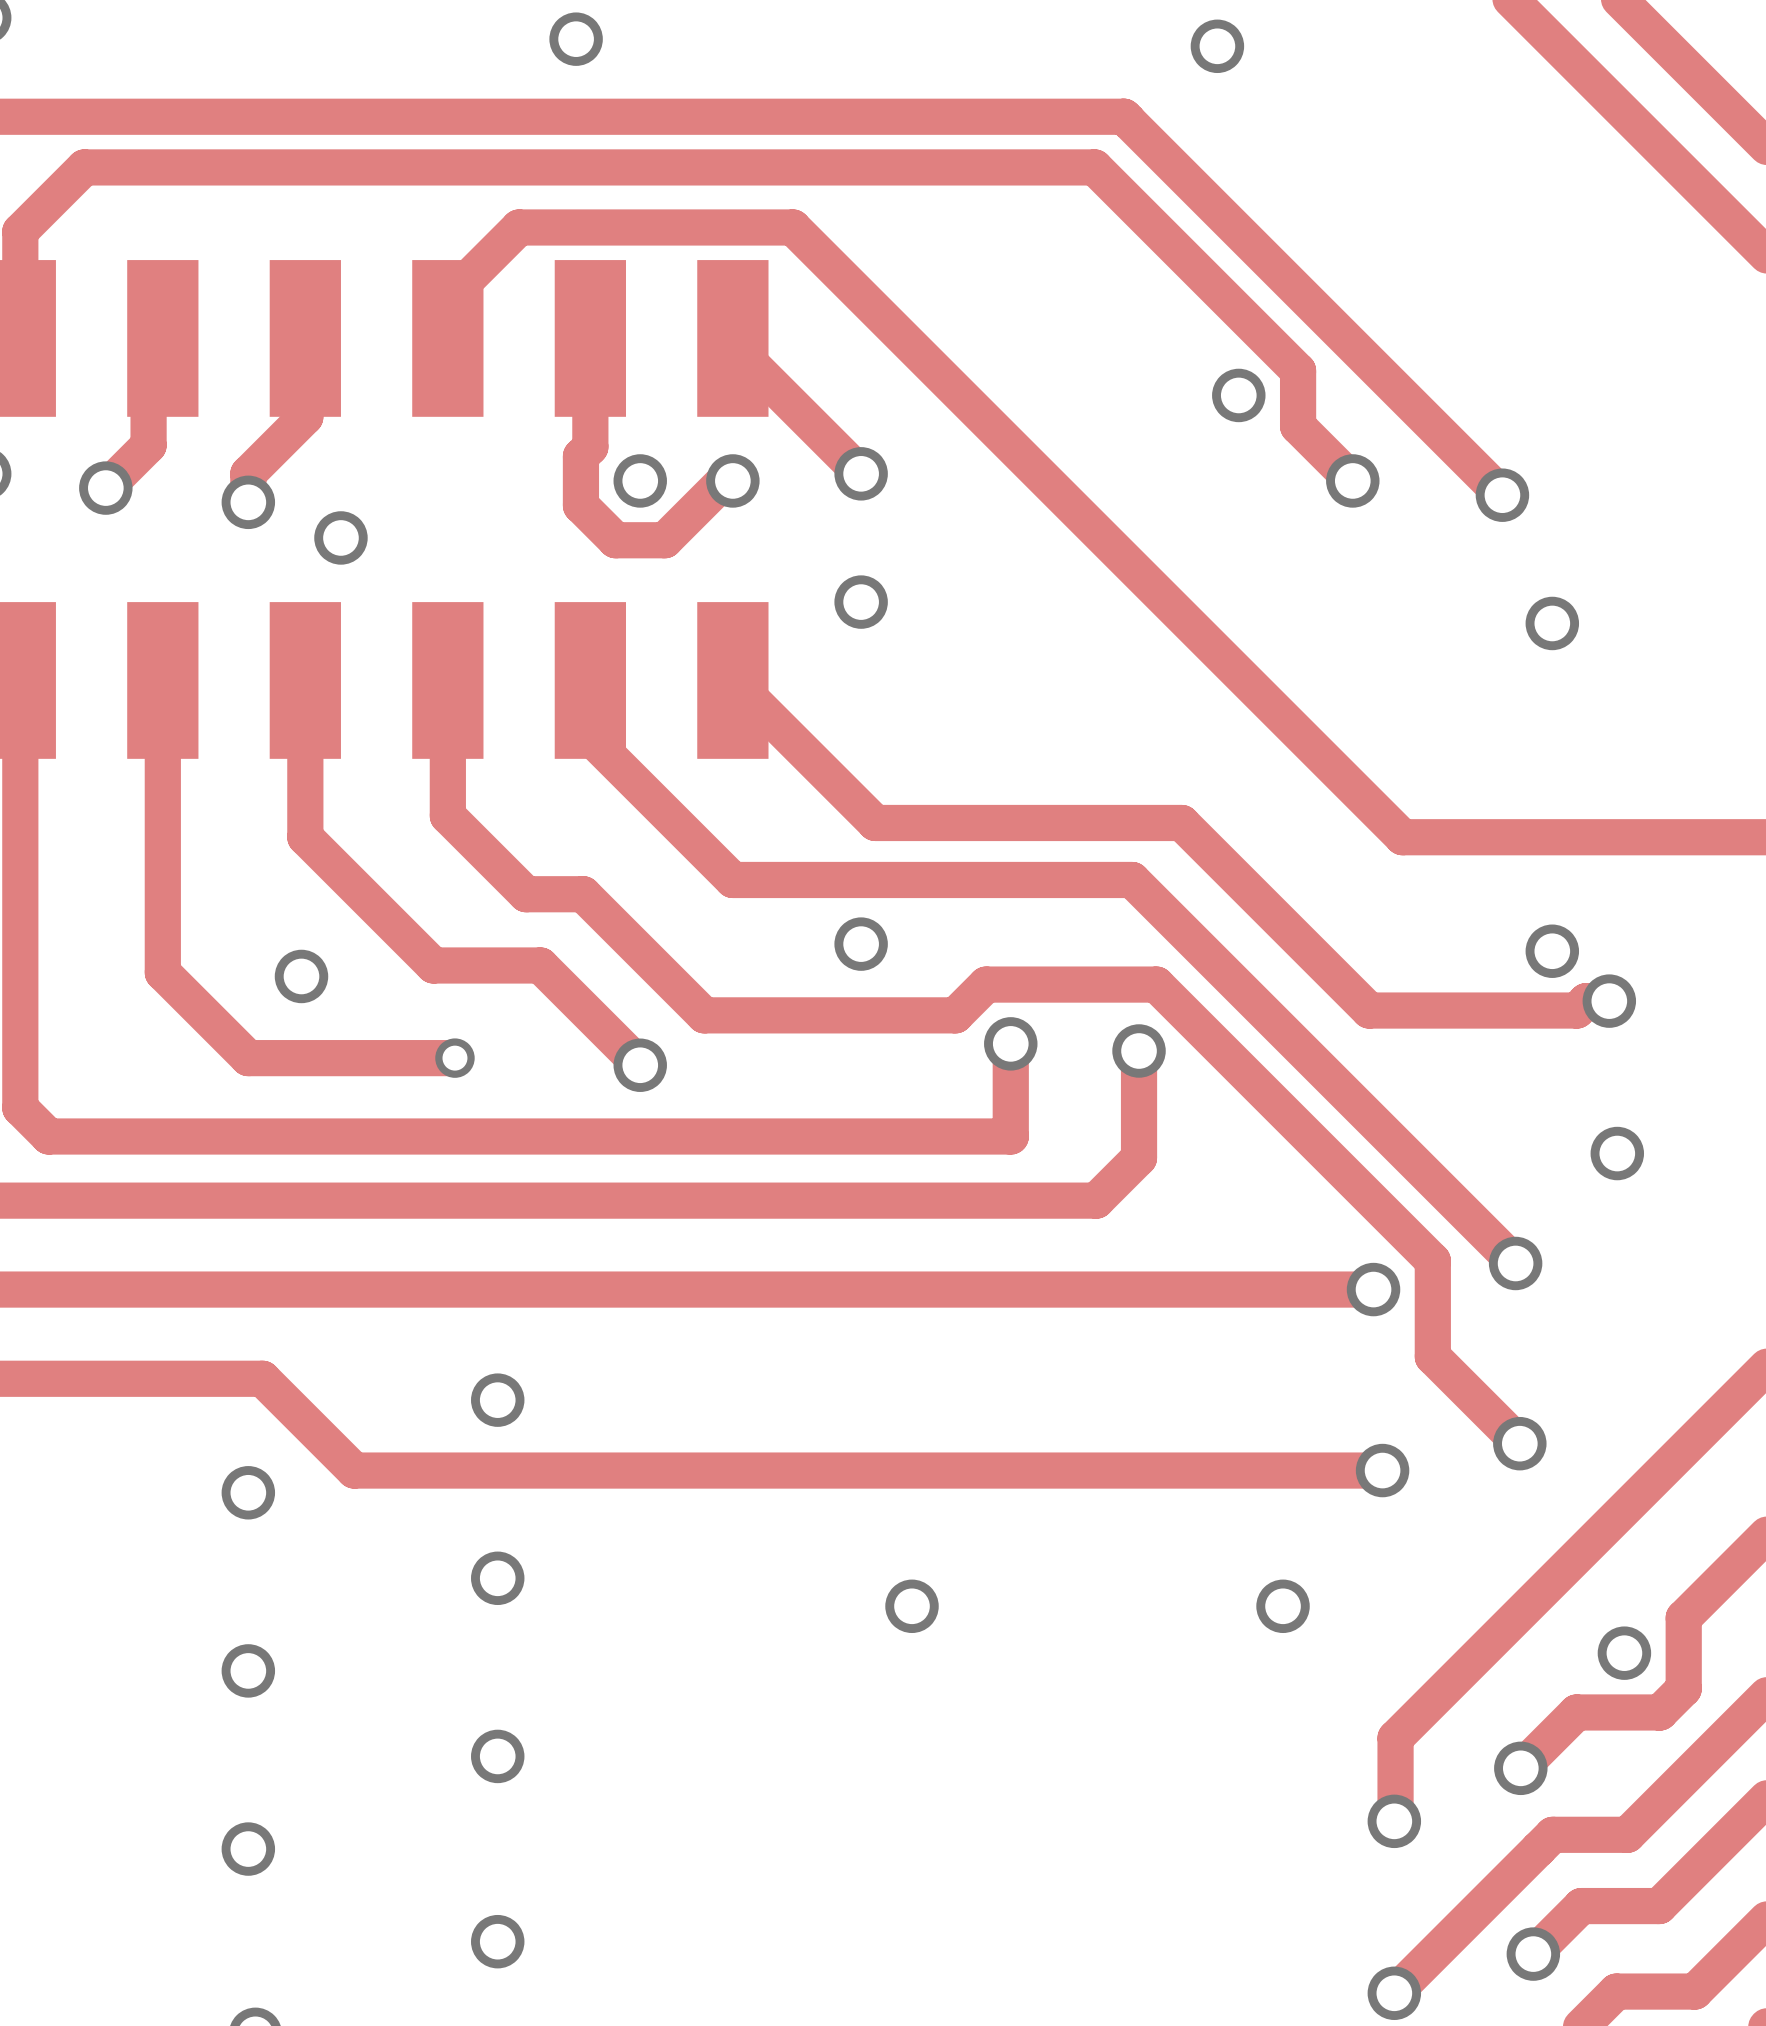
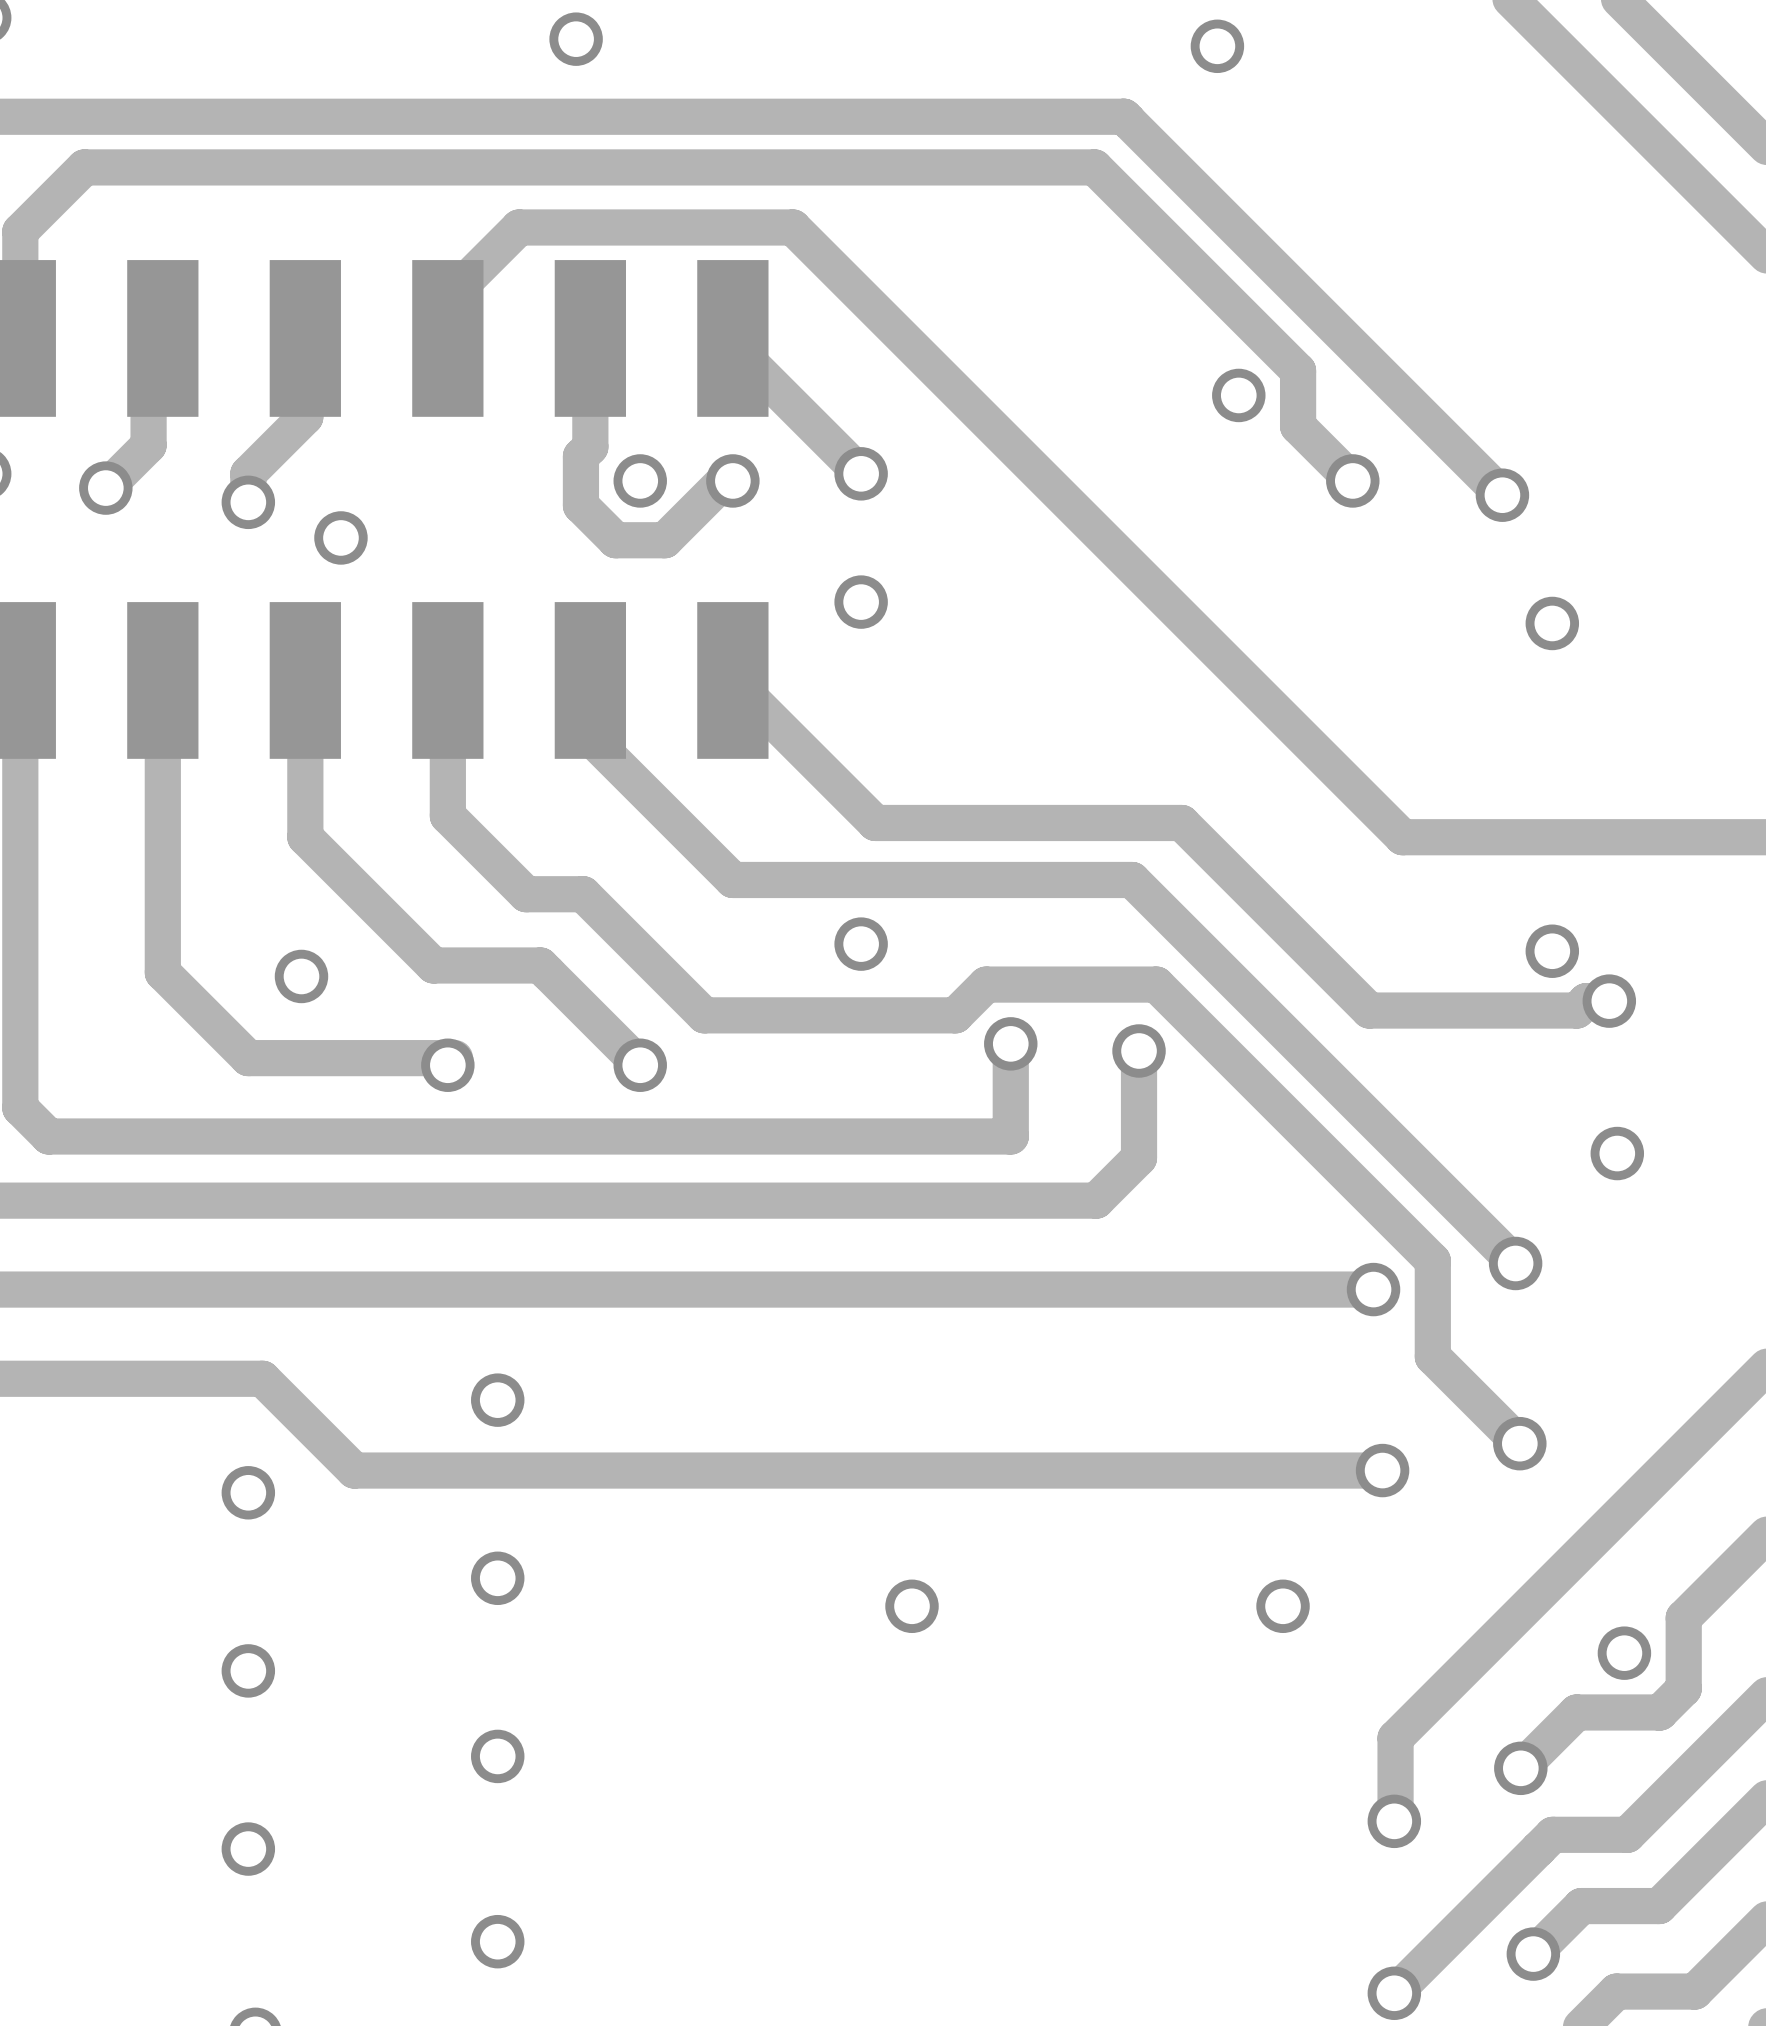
via size: [435, 1038, 475, 1078] -> [421, 1038, 475, 1092]

